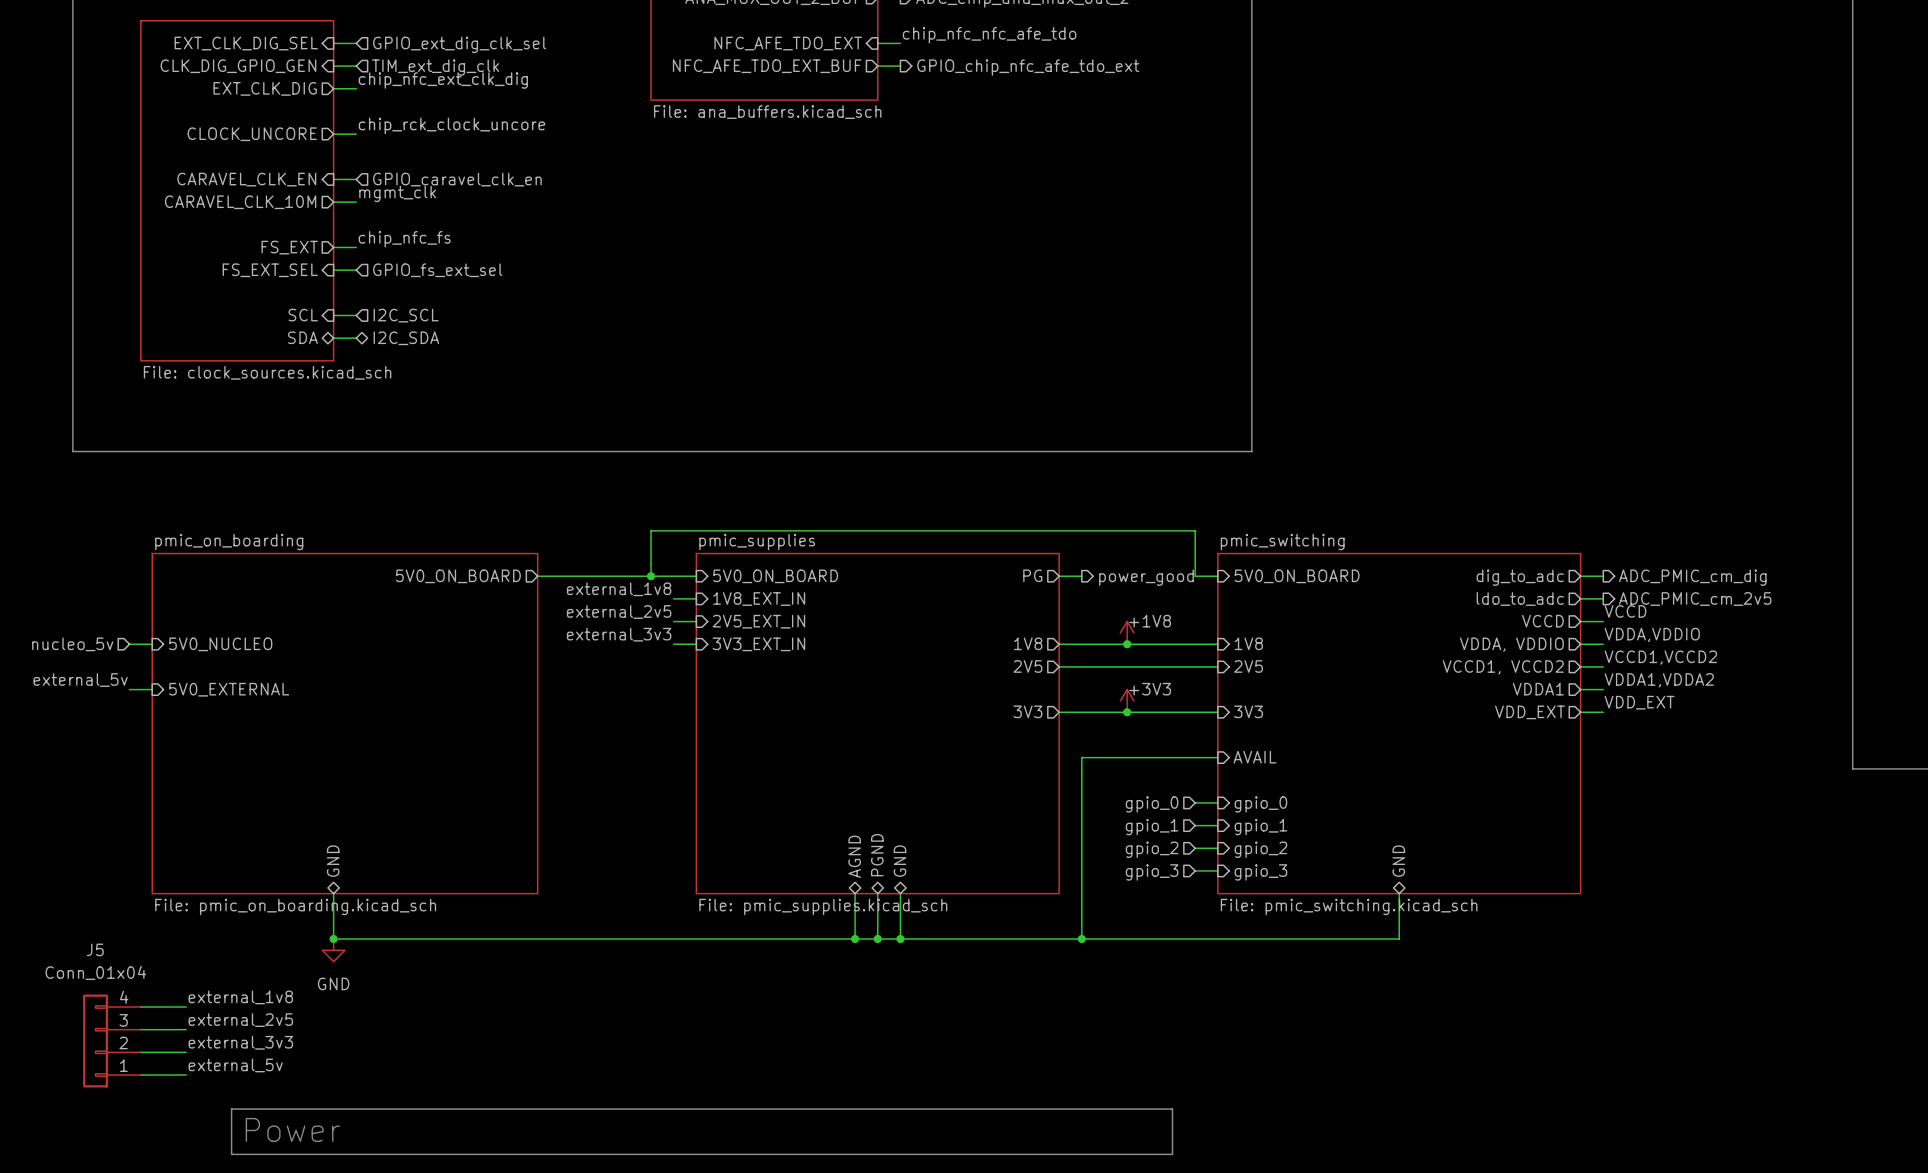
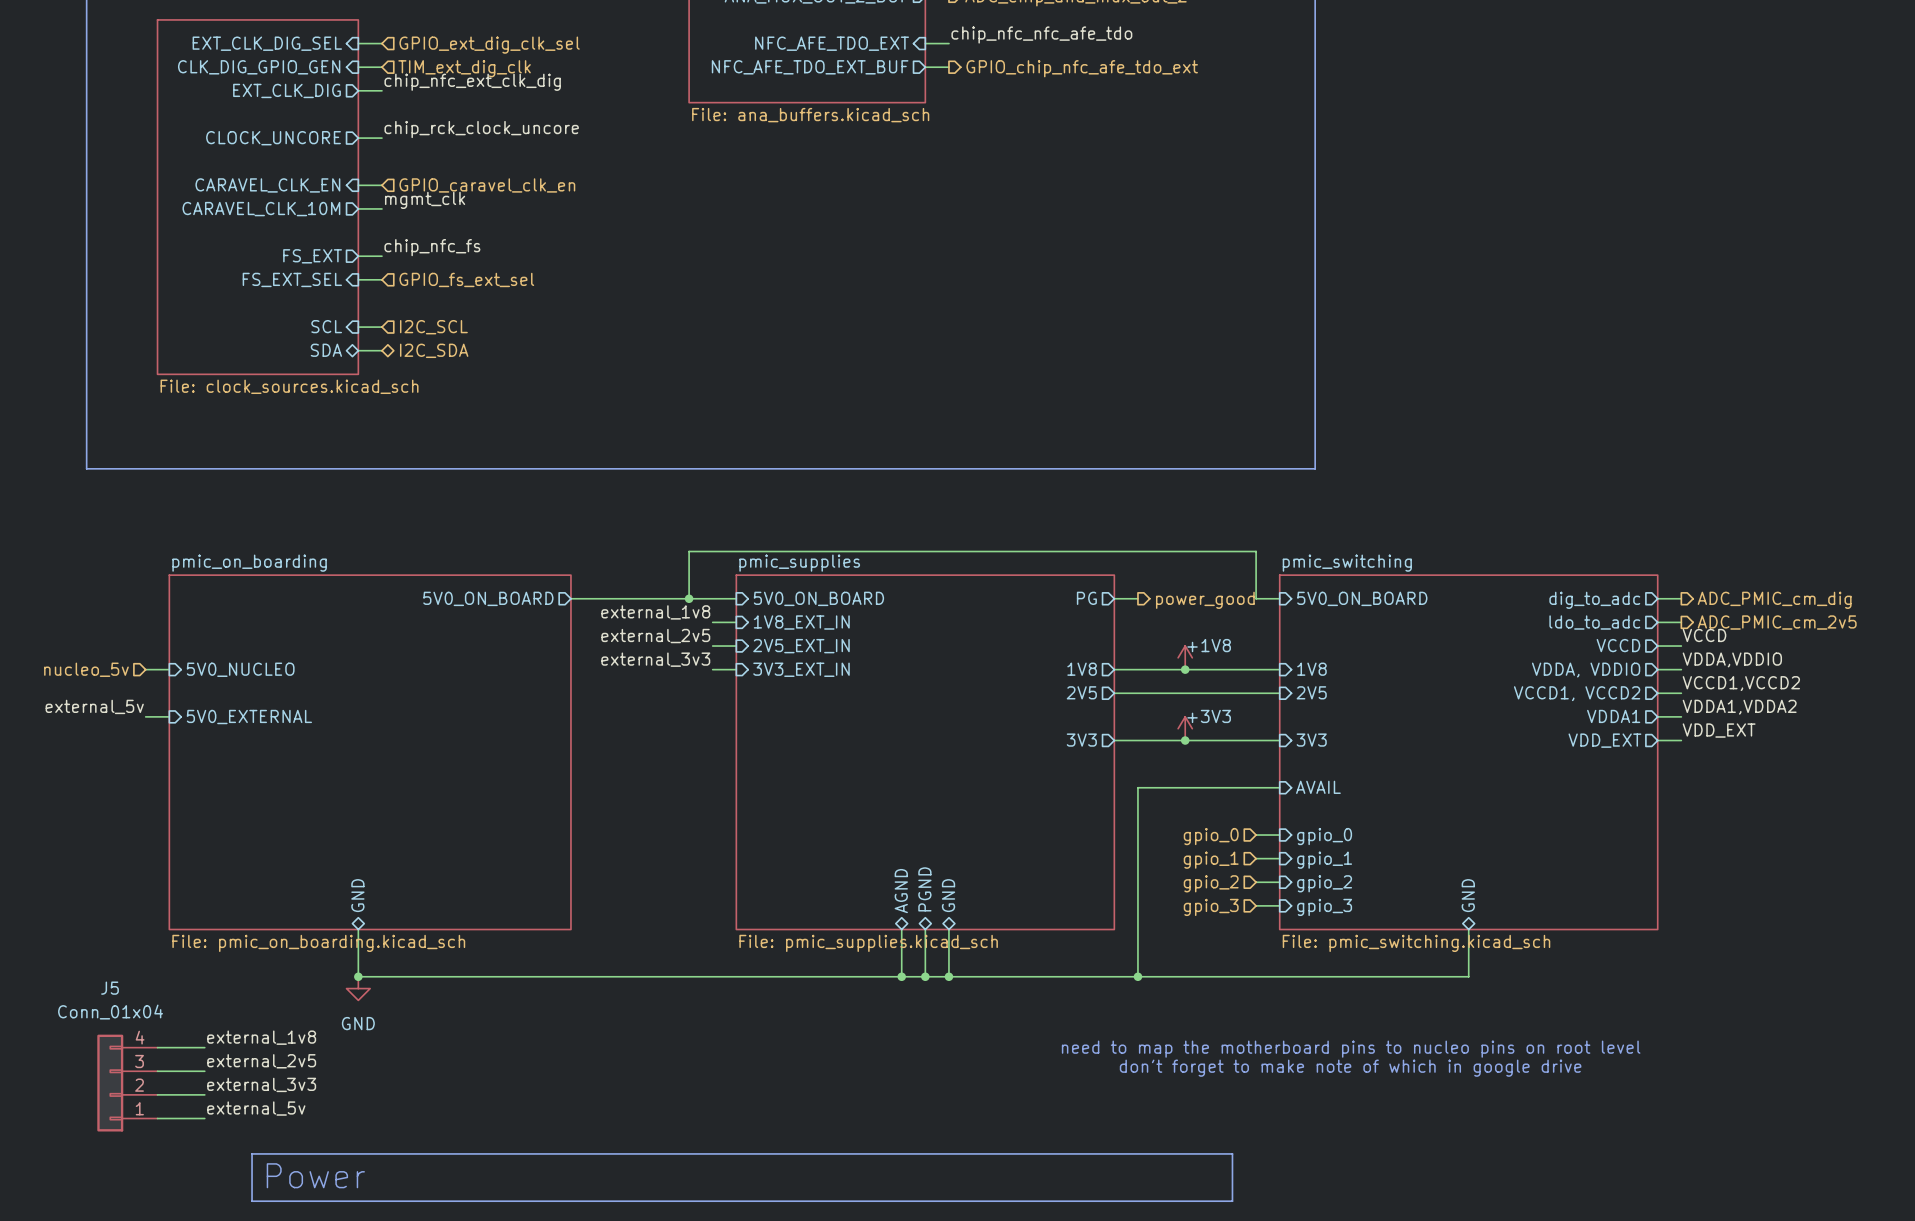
text: none -> need to map the motherboard pins to nucleo pins on root level (1351, 1049)
text: none -> don't forget to make note of which in google drive (1350, 1068)

